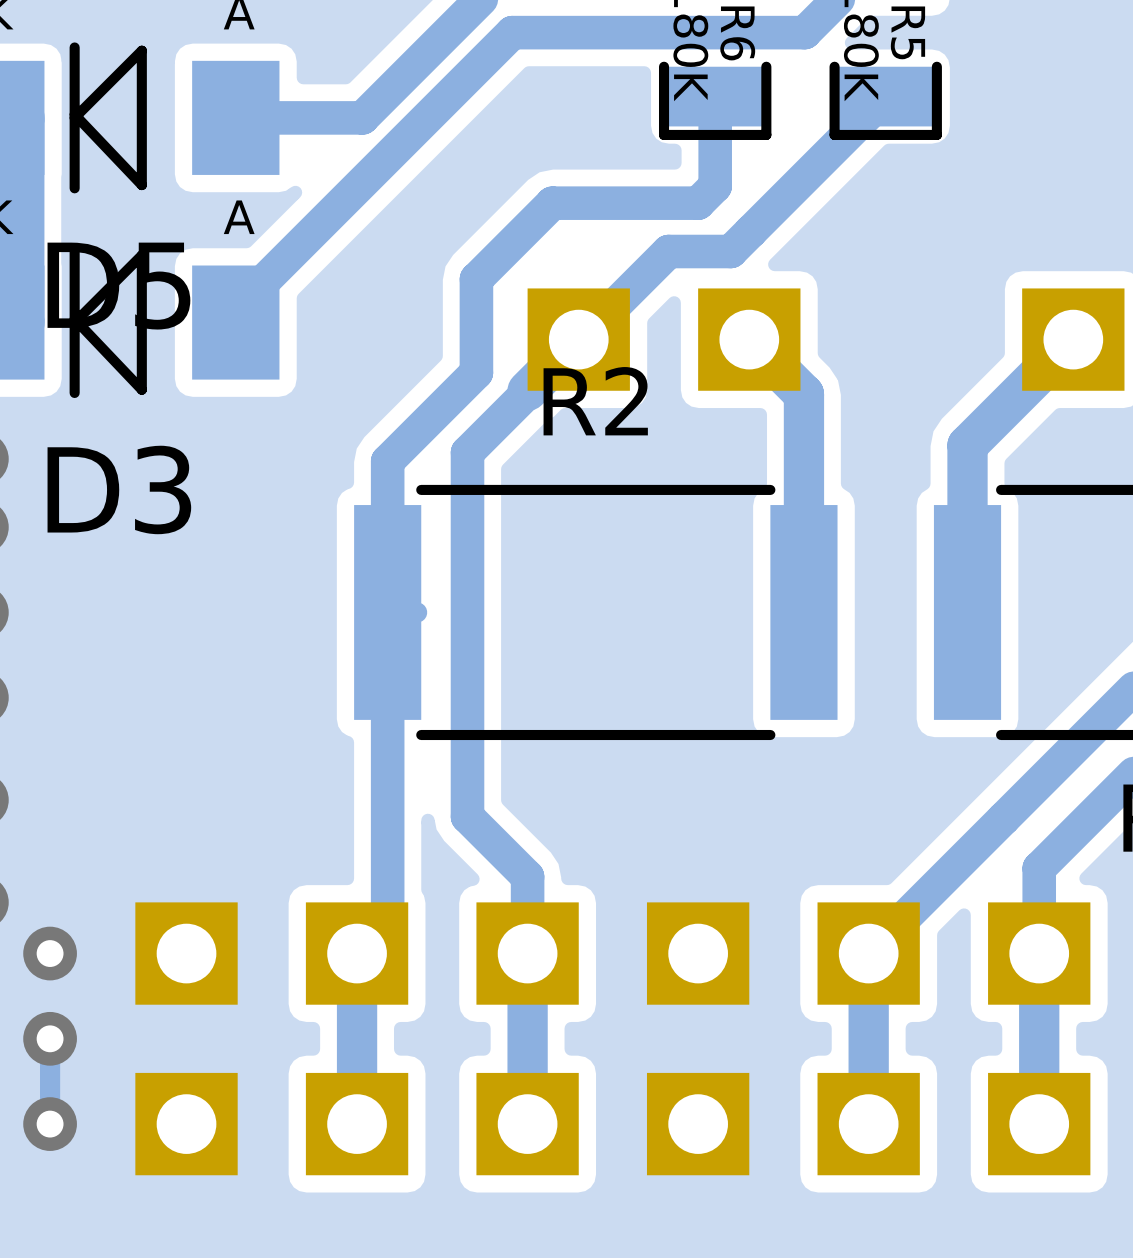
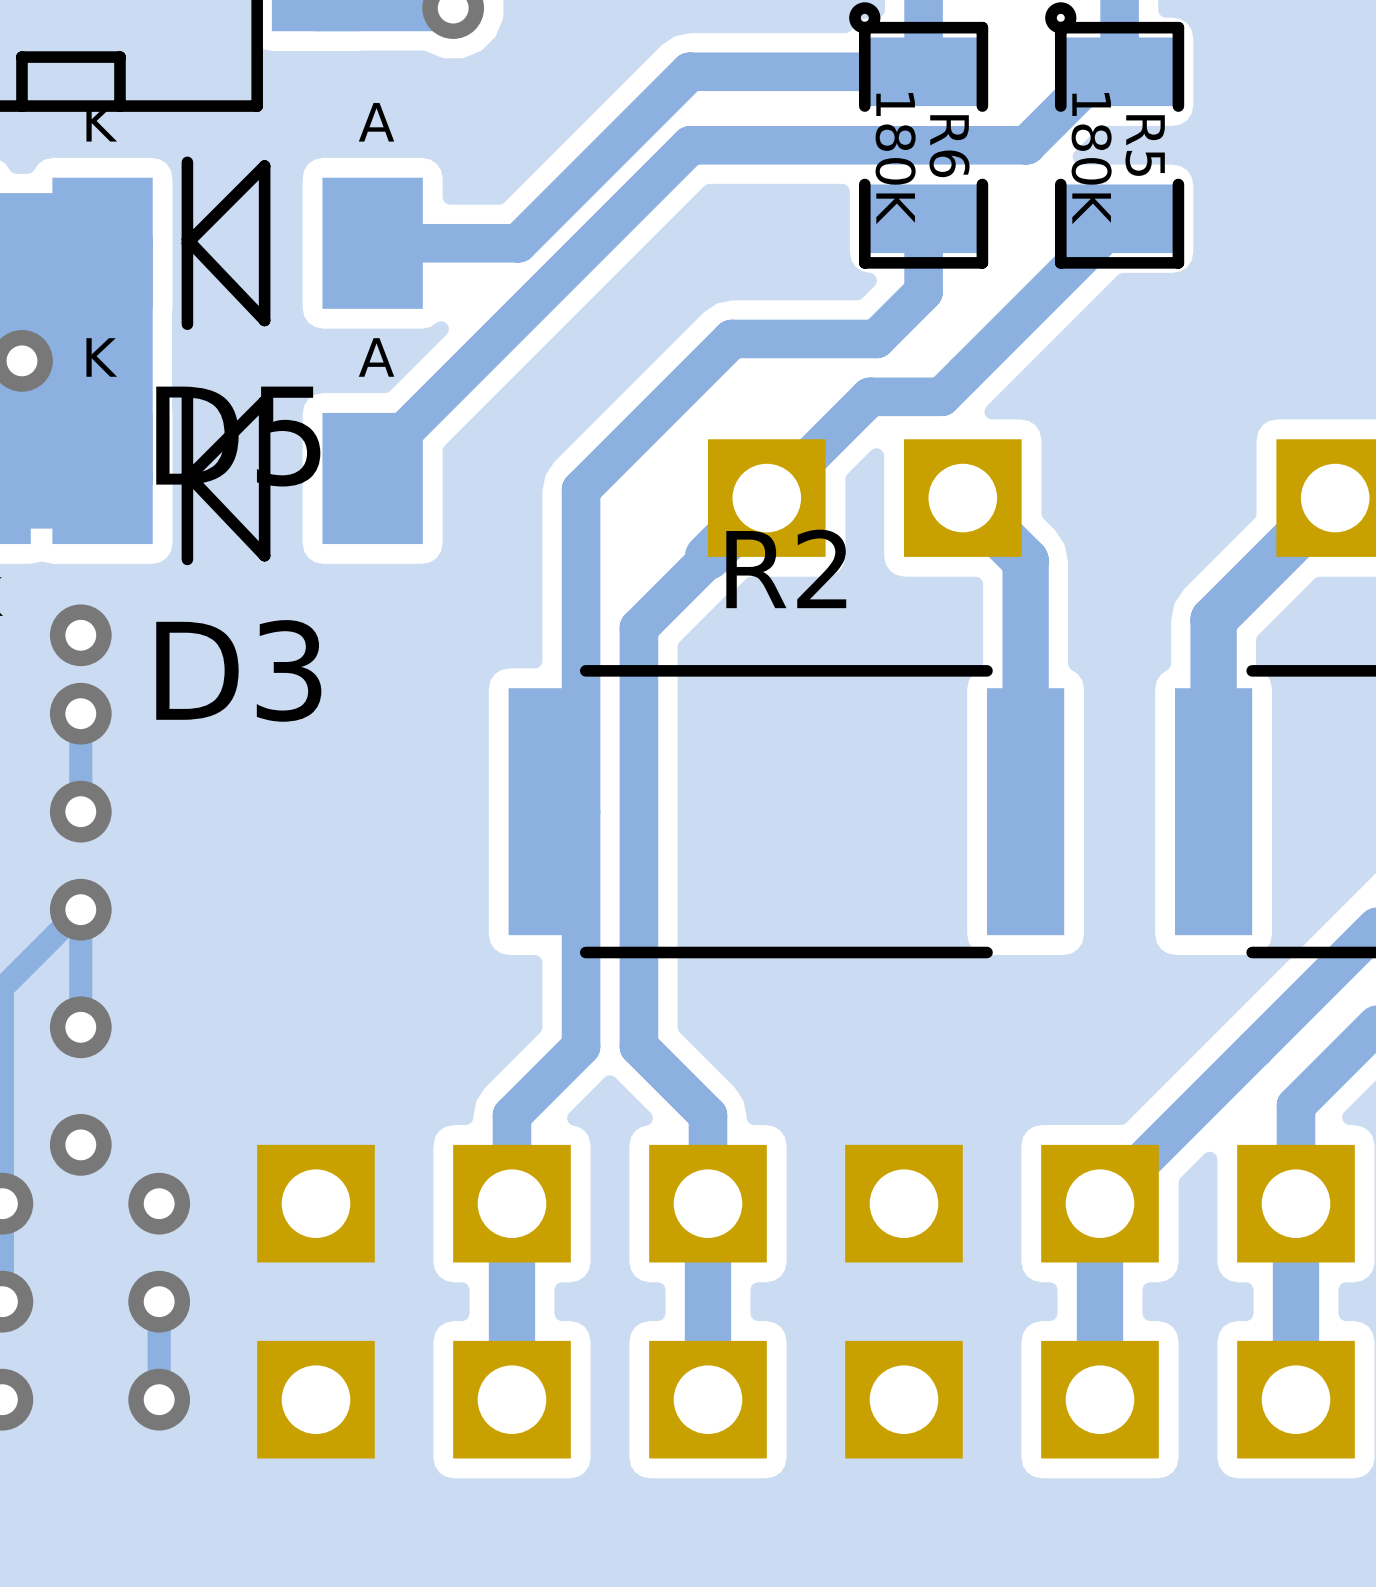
track: (715, 160) (715, 186) (698, 203) (552, 203) (476, 279) (476, 372) (387, 461) (387, 922) (357, 953) -> (923, 291) (876, 338) (731, 338) (581, 489) (581, 1046) (511, 1115) (511, 1203)

